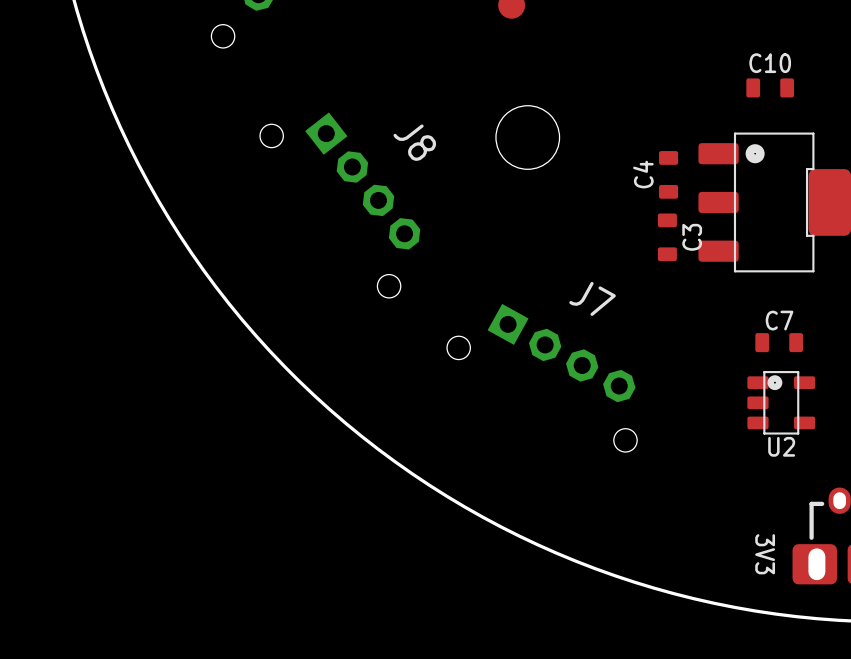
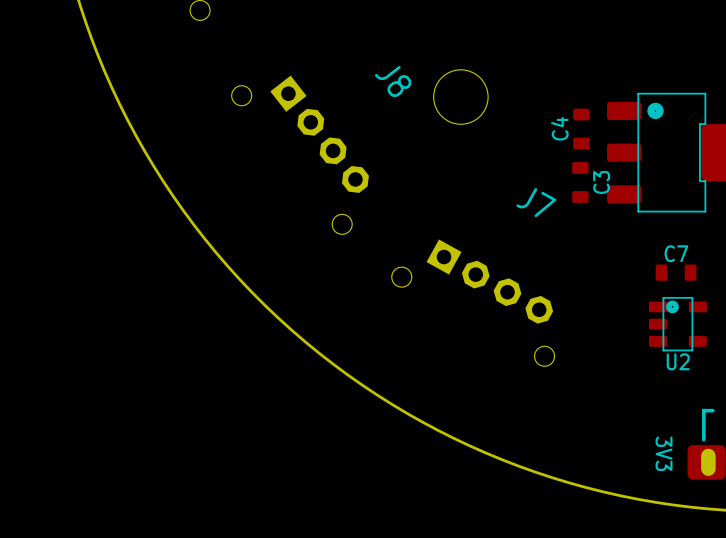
C10: (770, 87) -> none
J8 name position: J8 (414, 142) -> J8 (393, 81)
J7 name position: J7 (592, 298) -> J7 (536, 202)

